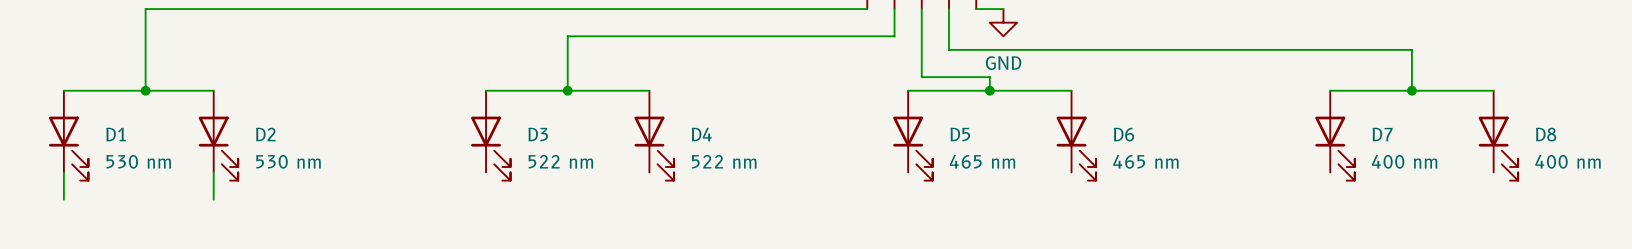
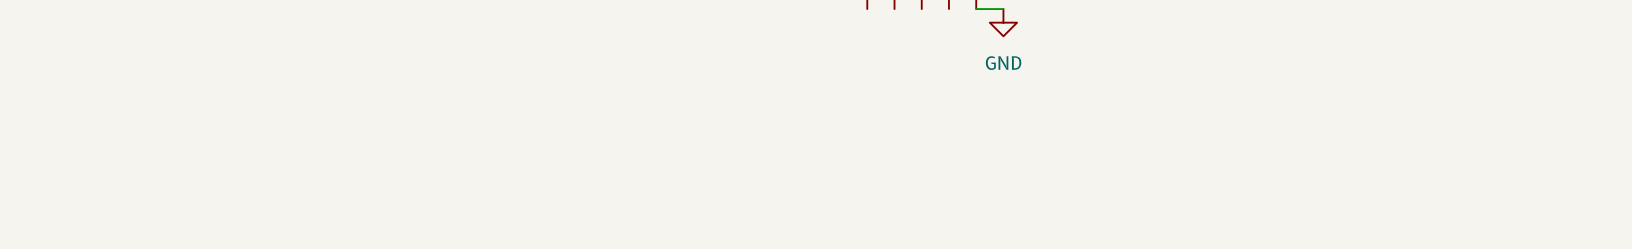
wire: (867, 9) (145, 9) (145, 90) -> none
wire: (894, 9) (894, 36) (567, 36) (567, 90) -> none
wire: (921, 9) (921, 77) (989, 77) (989, 90) -> none
wire: (948, 9) (948, 49) (1411, 49) (1411, 90) -> none
wire: (63, 90) (213, 90) -> none
junction: (145, 90) -> none
wire: (486, 90) (649, 90) -> none
junction: (567, 90) -> none
wire: (908, 90) (1071, 90) -> none
junction: (989, 90) -> none
wire: (1330, 90) (1493, 90) -> none
junction: (1411, 90) -> none
D1: 530 nm (68, 135) -> none
D2: 530 nm (218, 135) -> none
D3: 522 nm (490, 135) -> none
D4: 522 nm (654, 135) -> none
D5: 465 nm (912, 135) -> none
D6: 465 nm (1076, 135) -> none
D7: 400 nm (1335, 135) -> none
D8: 400 nm (1498, 135) -> none
wire: (63, 172) (63, 199) -> none
wire: (213, 172) (213, 199) -> none

